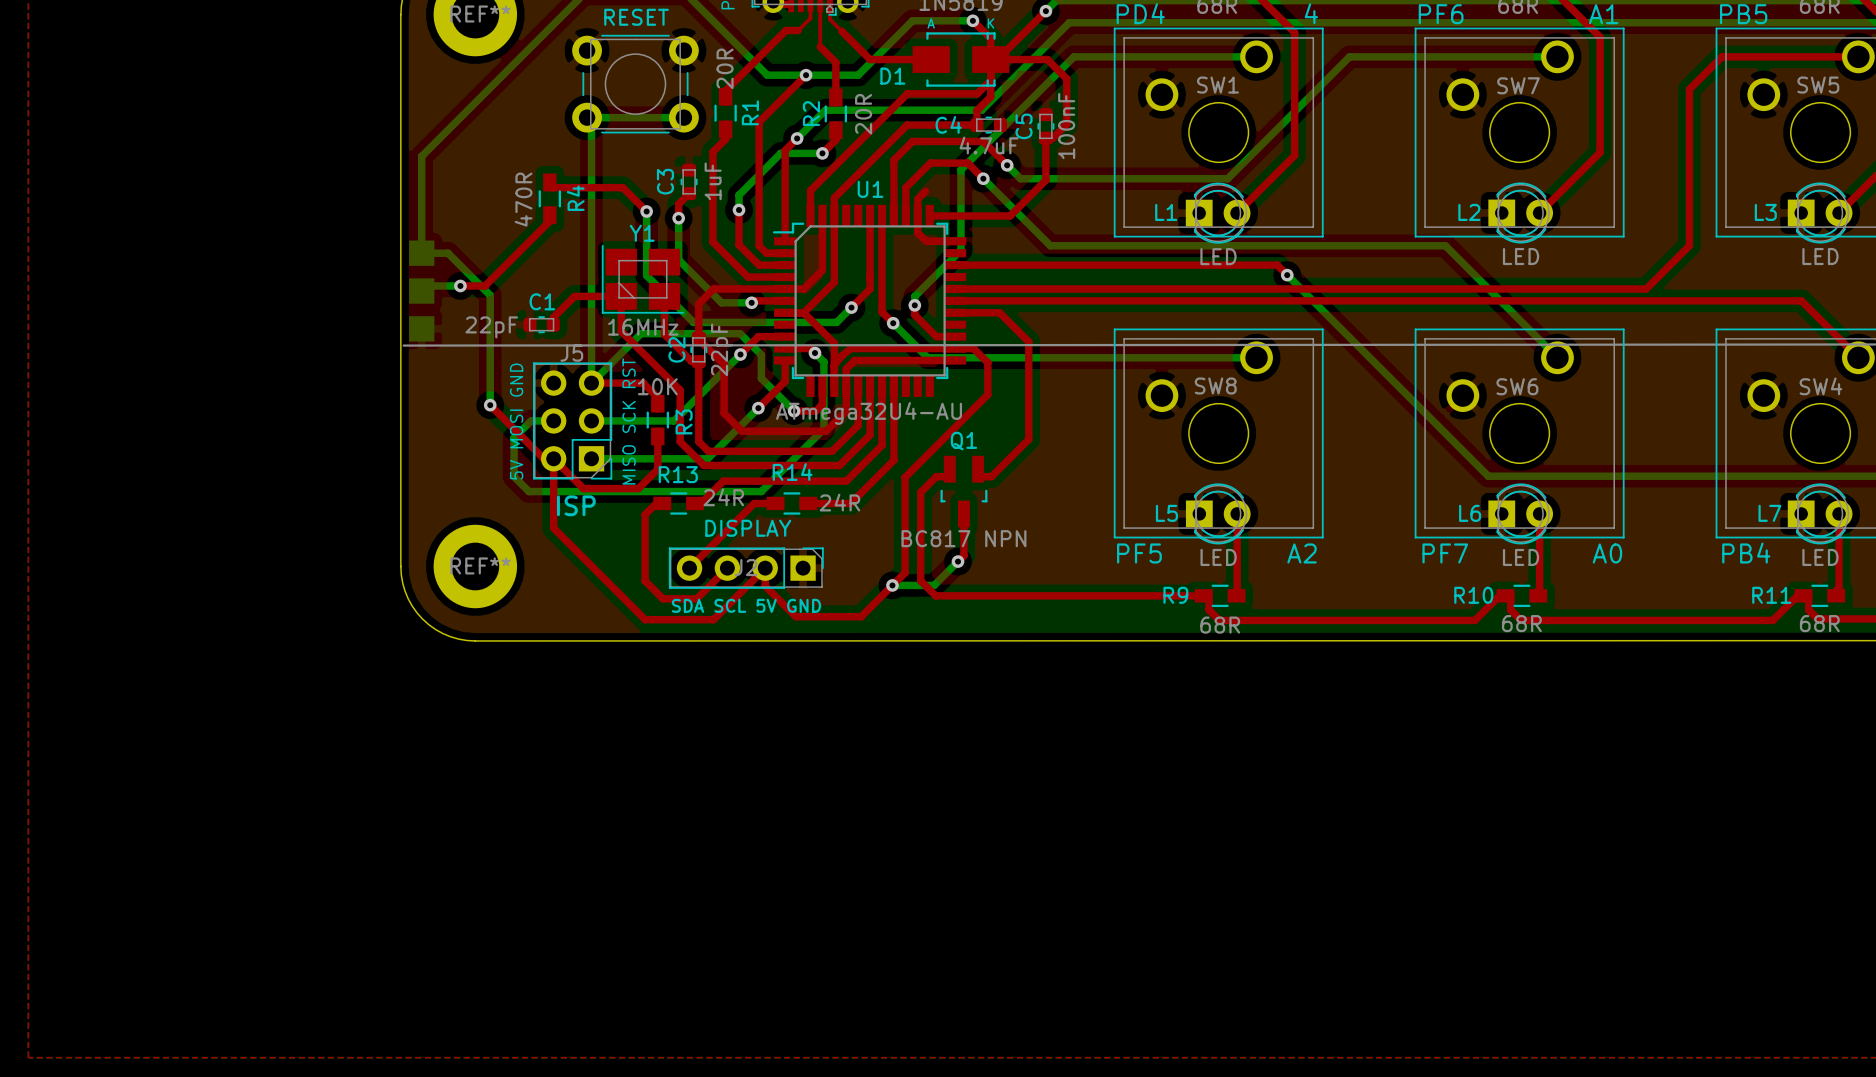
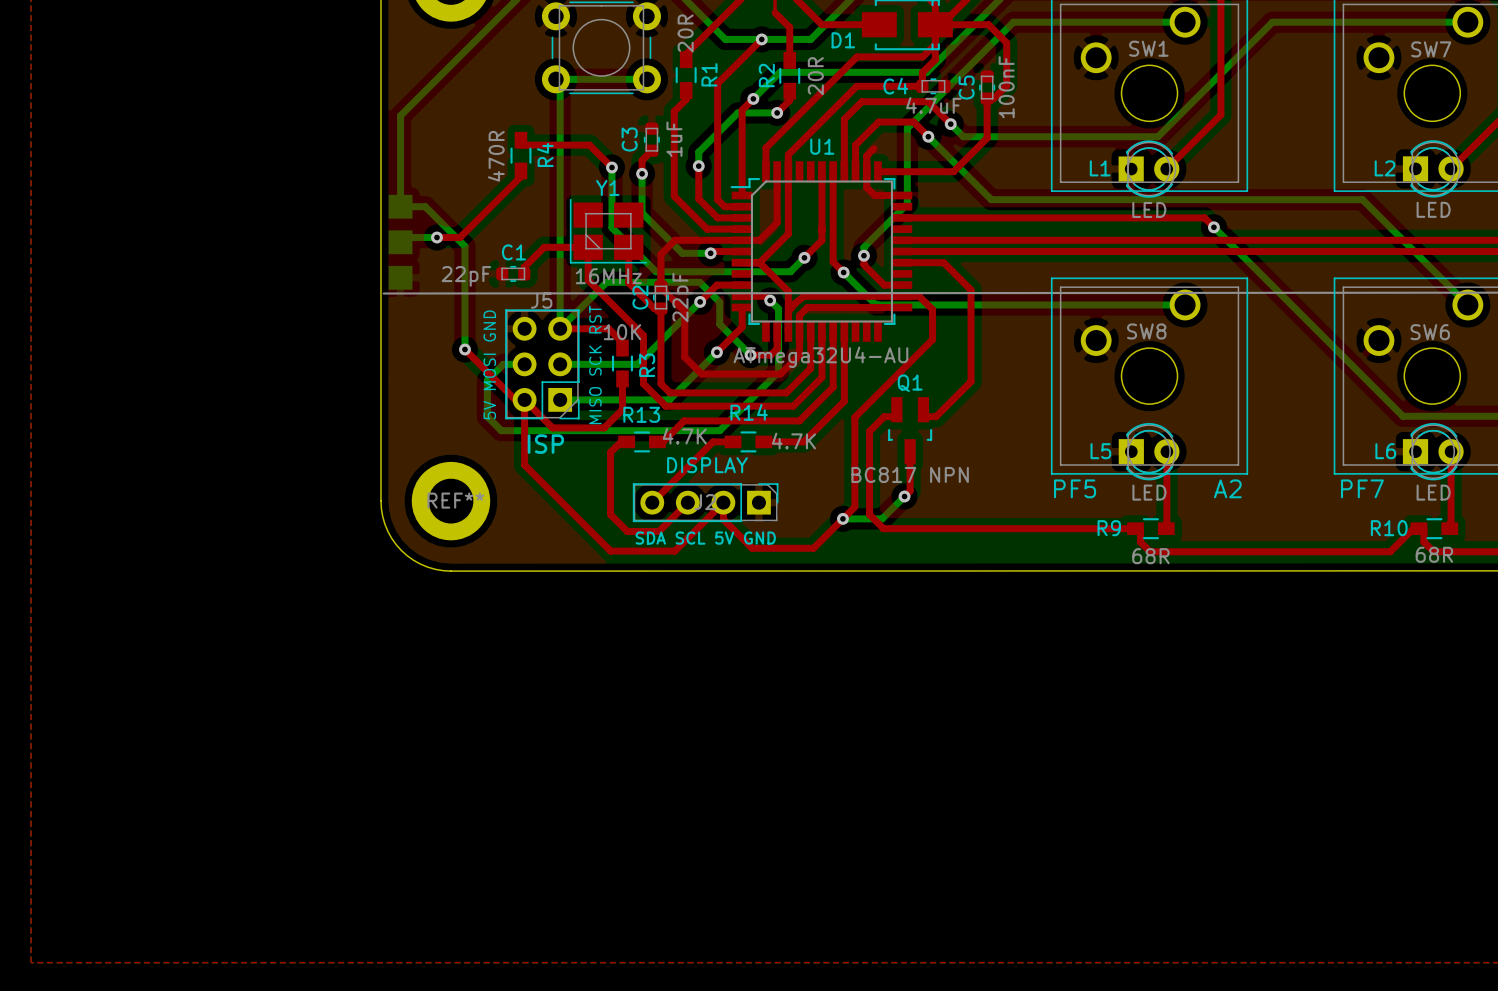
R13 value: 24R (723, 497) -> 4.7K (684, 436)
R14 value: 24R (839, 502) -> 4.7K (793, 441)

